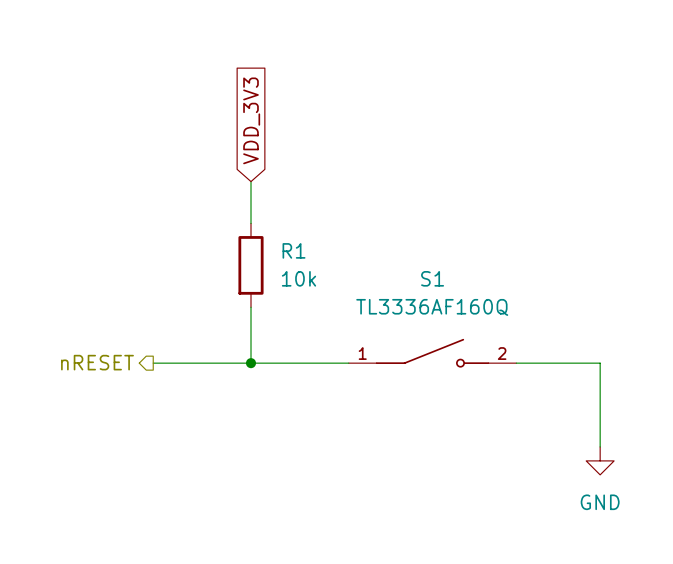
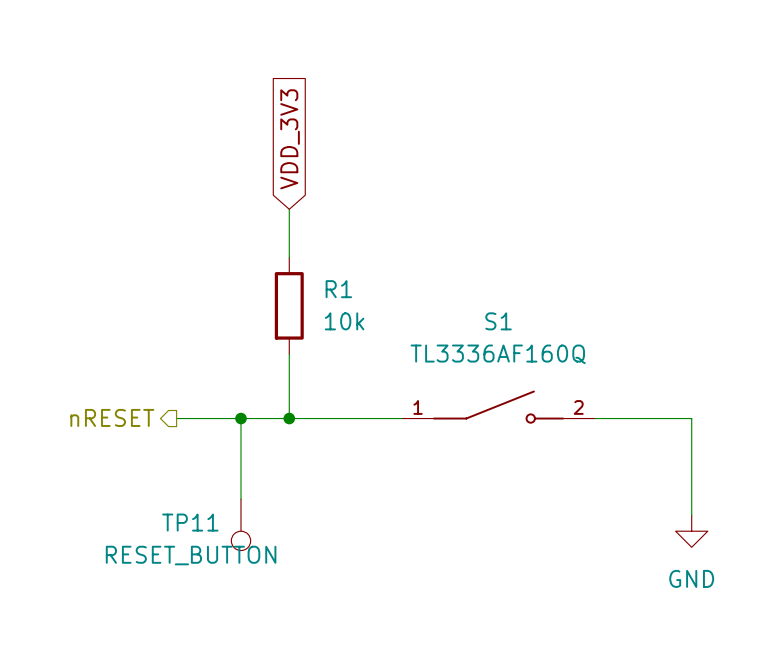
wire: none -> (240, 418) (240, 499)
junction: none -> (240, 418)
TP11: none -> RESET_BUTTON (240, 524)

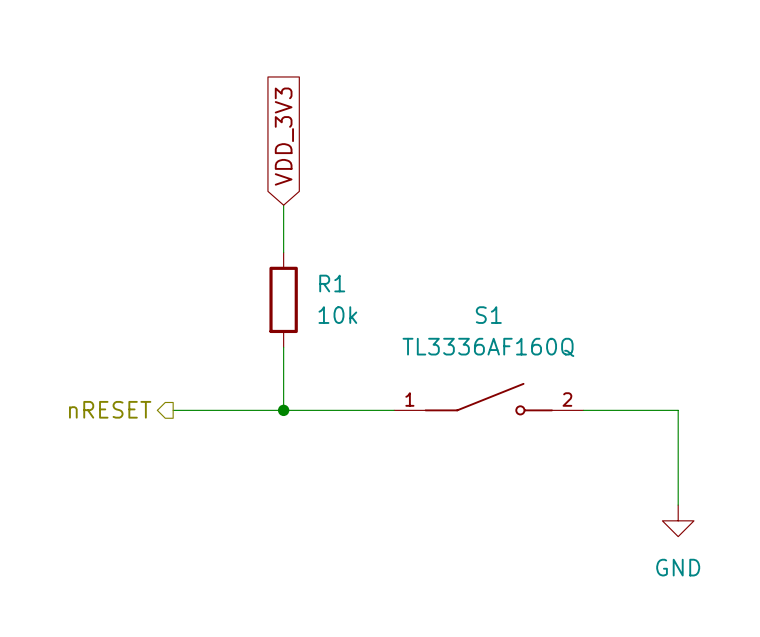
wire: (240, 418) (240, 499) -> none
junction: (240, 418) -> none
TP11: RESET_BUTTON (240, 524) -> none

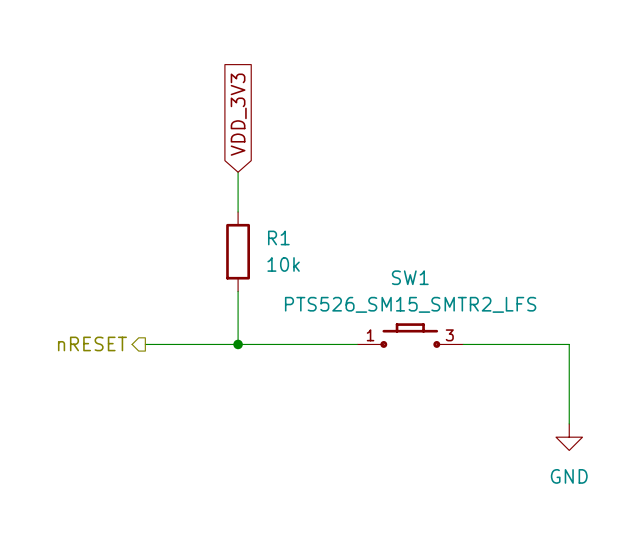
S1: TL3336AF160Q (488, 399) -> none
SW1: none -> PTS526_SM15_SMTR2_LFS (410, 335)

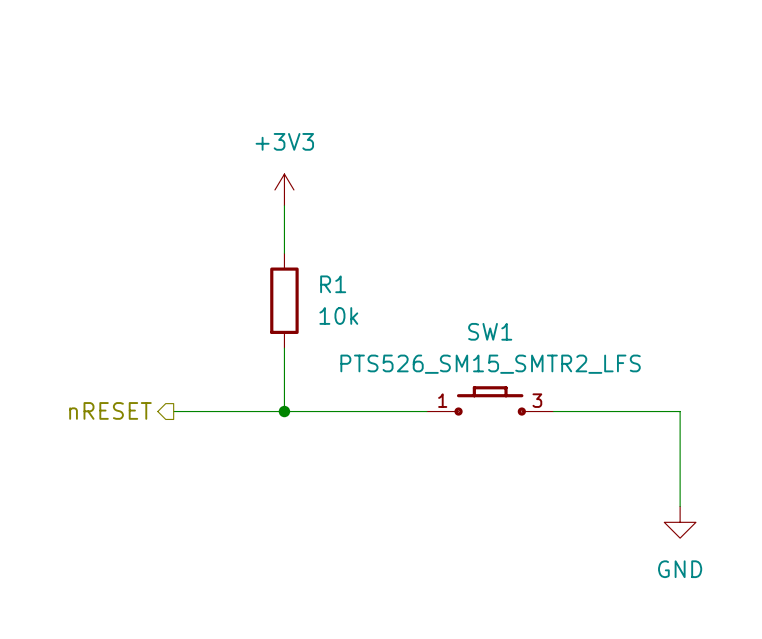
global label: VDD_3V3 (238, 114) -> none
power symbol: none -> +3V3 (284, 189)

